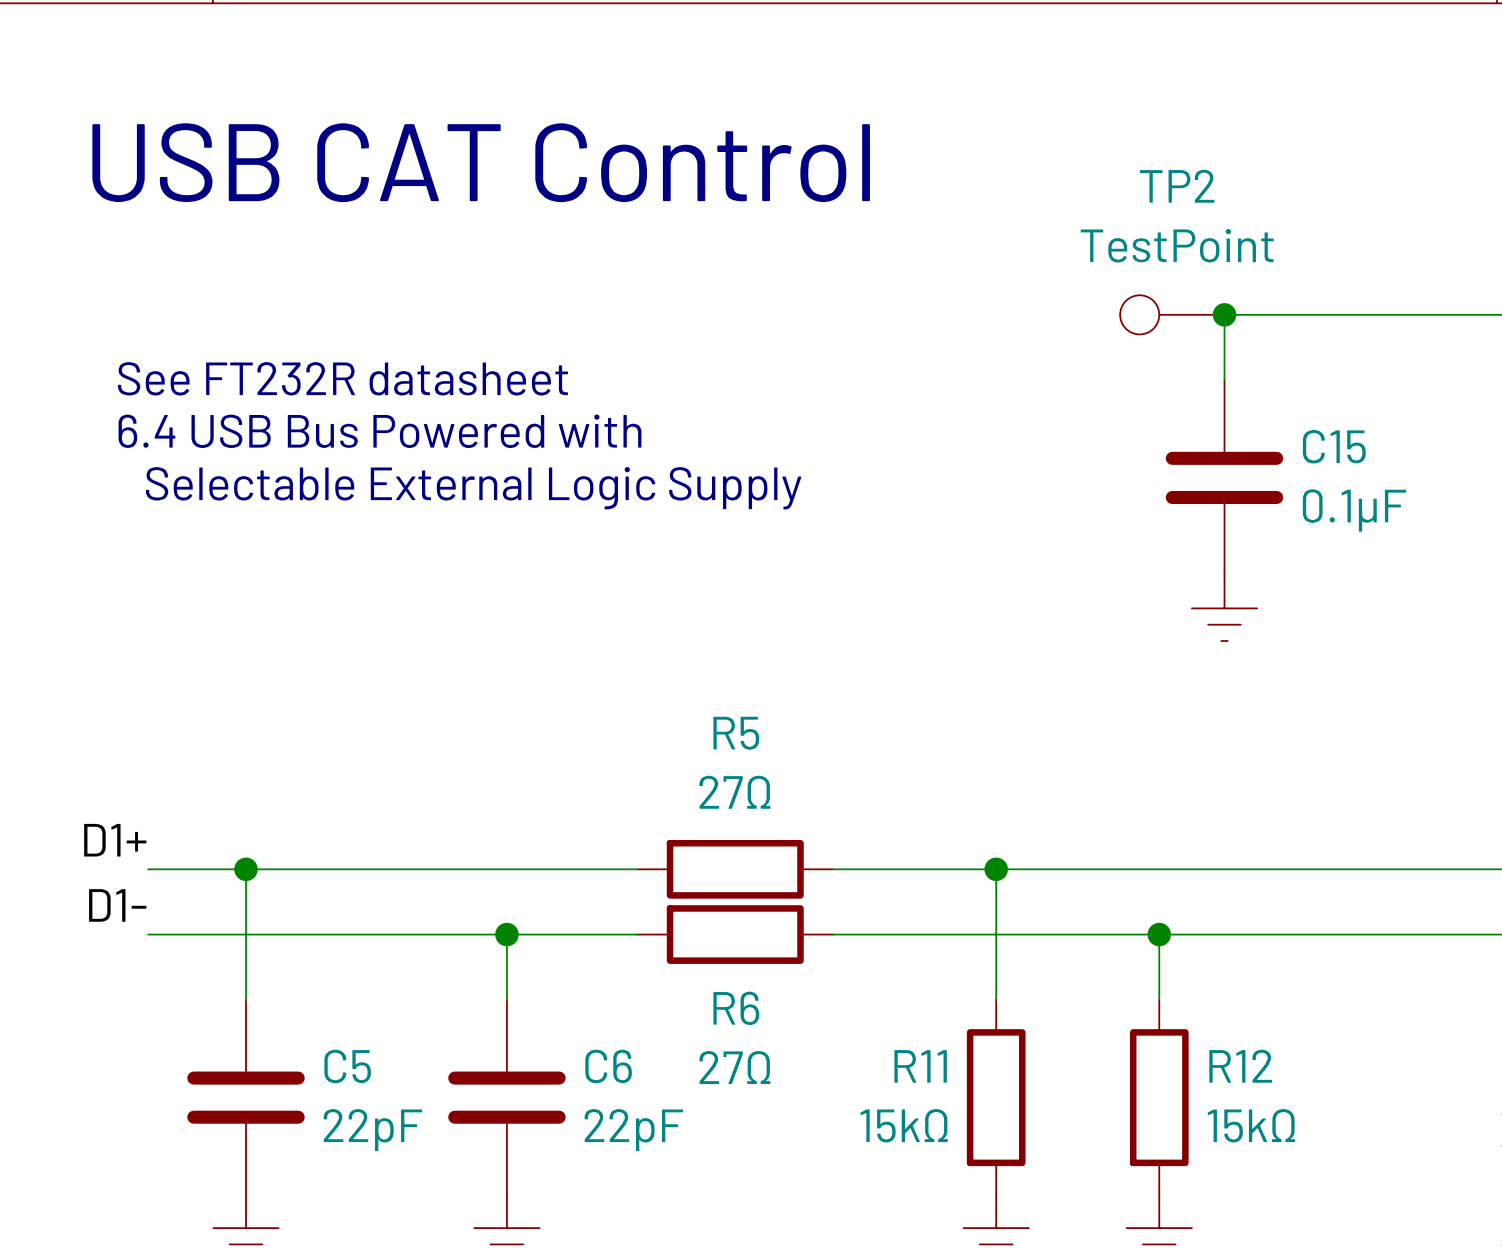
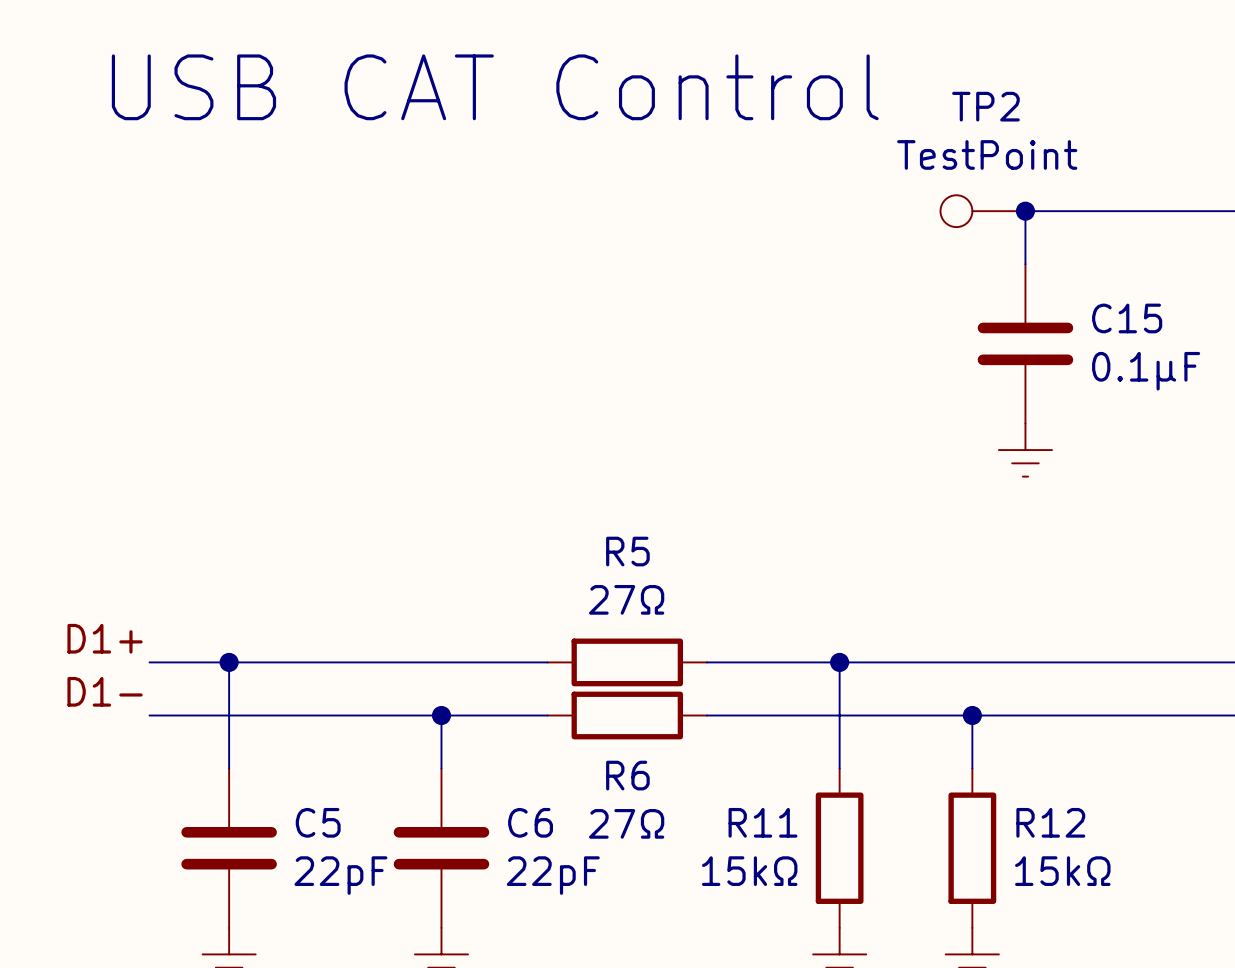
text: See FT232R datasheet (343, 378) -> none
text: 6.4 USB Bus Powered with (379, 431) -> none
text: Selectable External Logic Supply (473, 488) -> none

